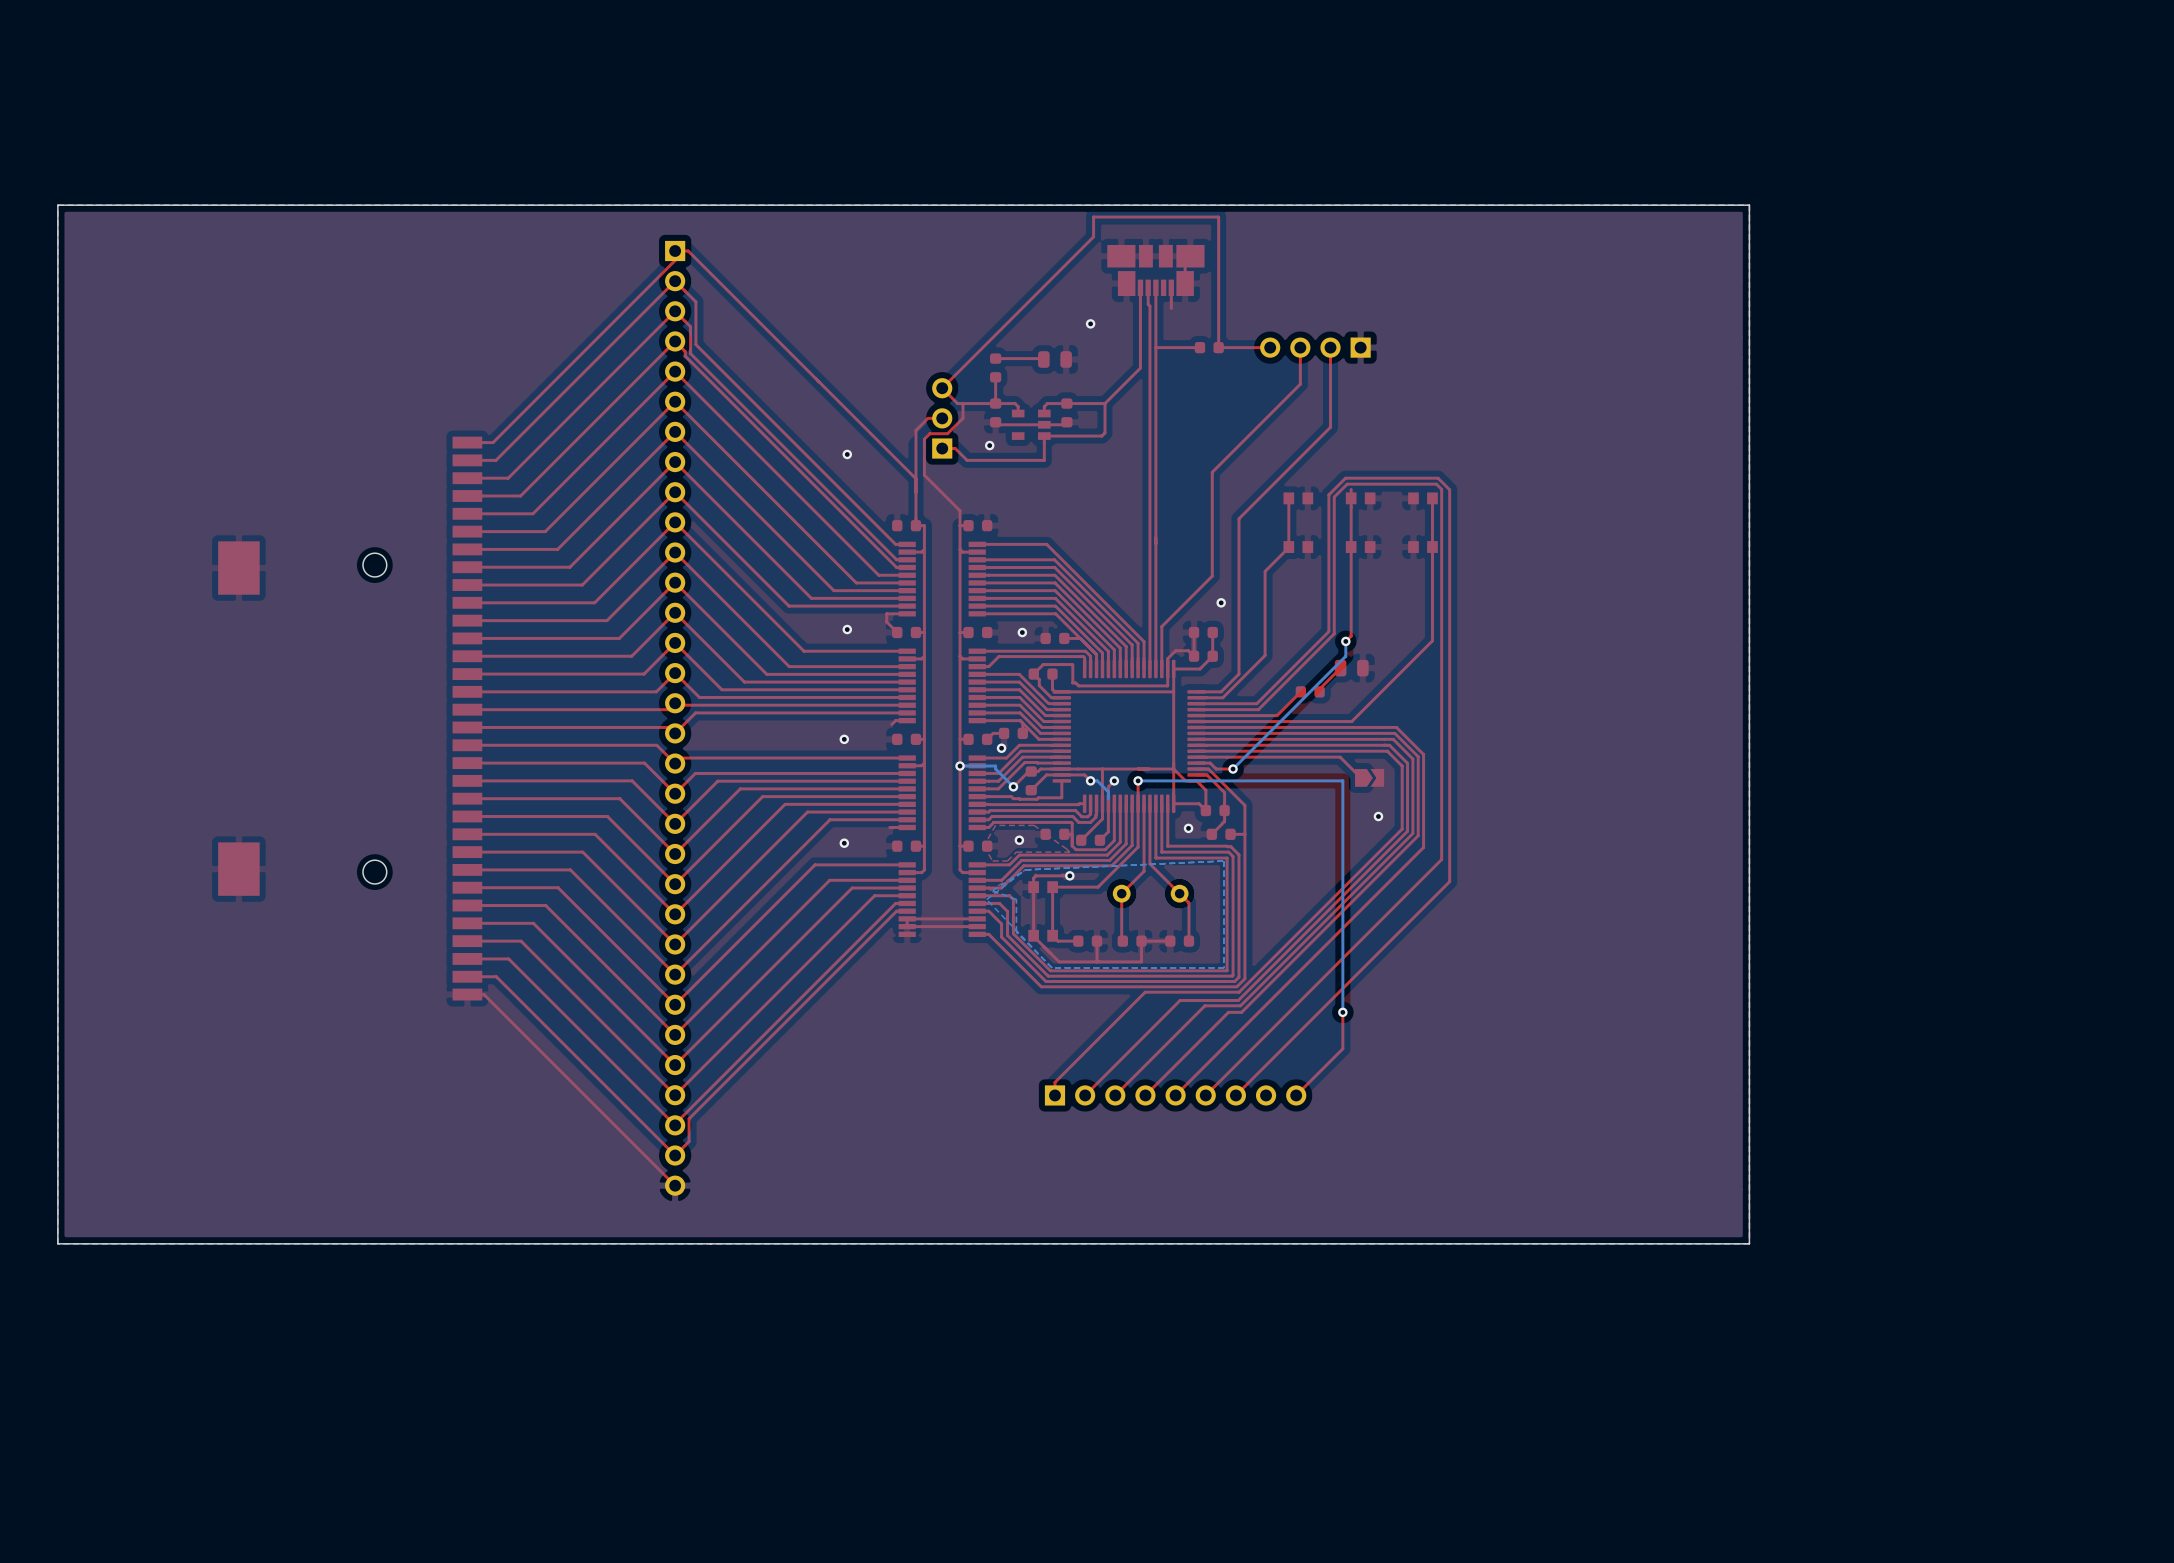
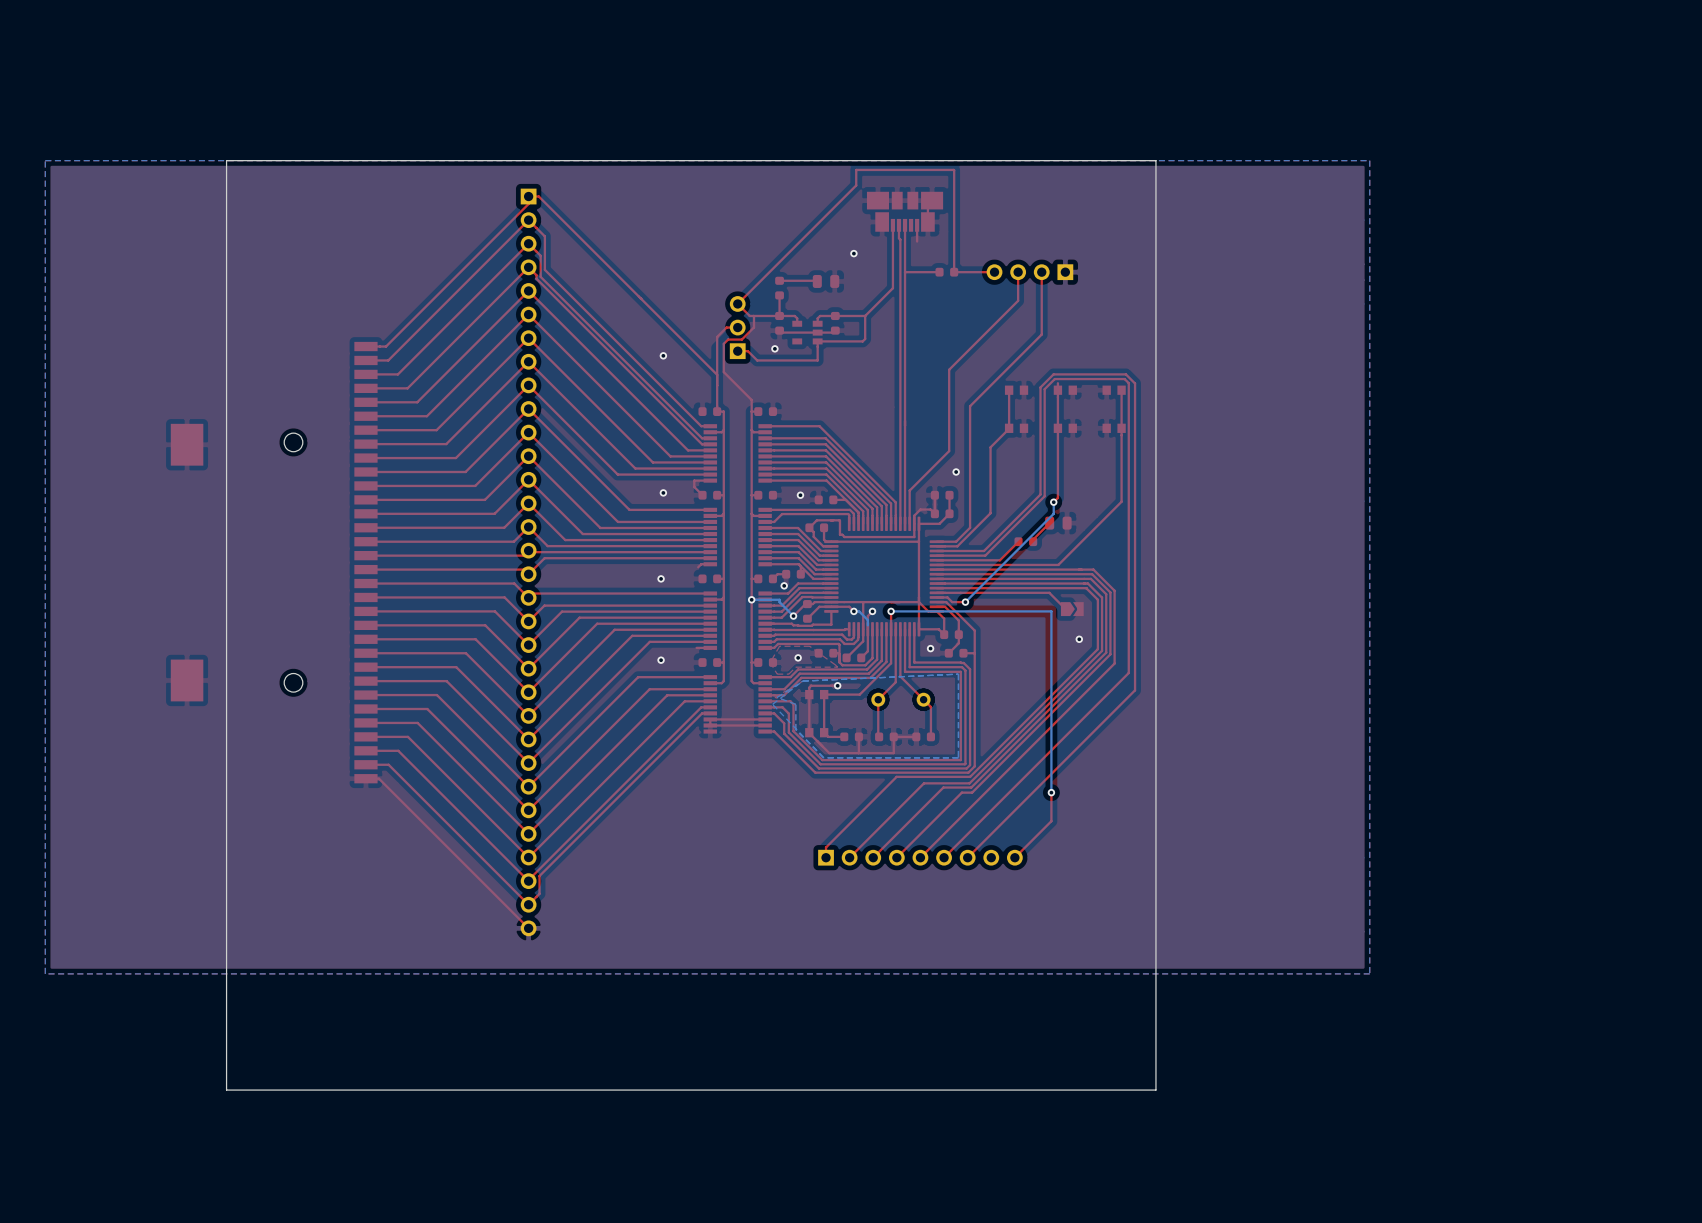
board edge: (1476, 205) (1749, 205) (1749, 1243) (57, 1243) (57, 205) (289, 205) -> (1155, 160) (1155, 1090) (226, 1090) (226, 160)

